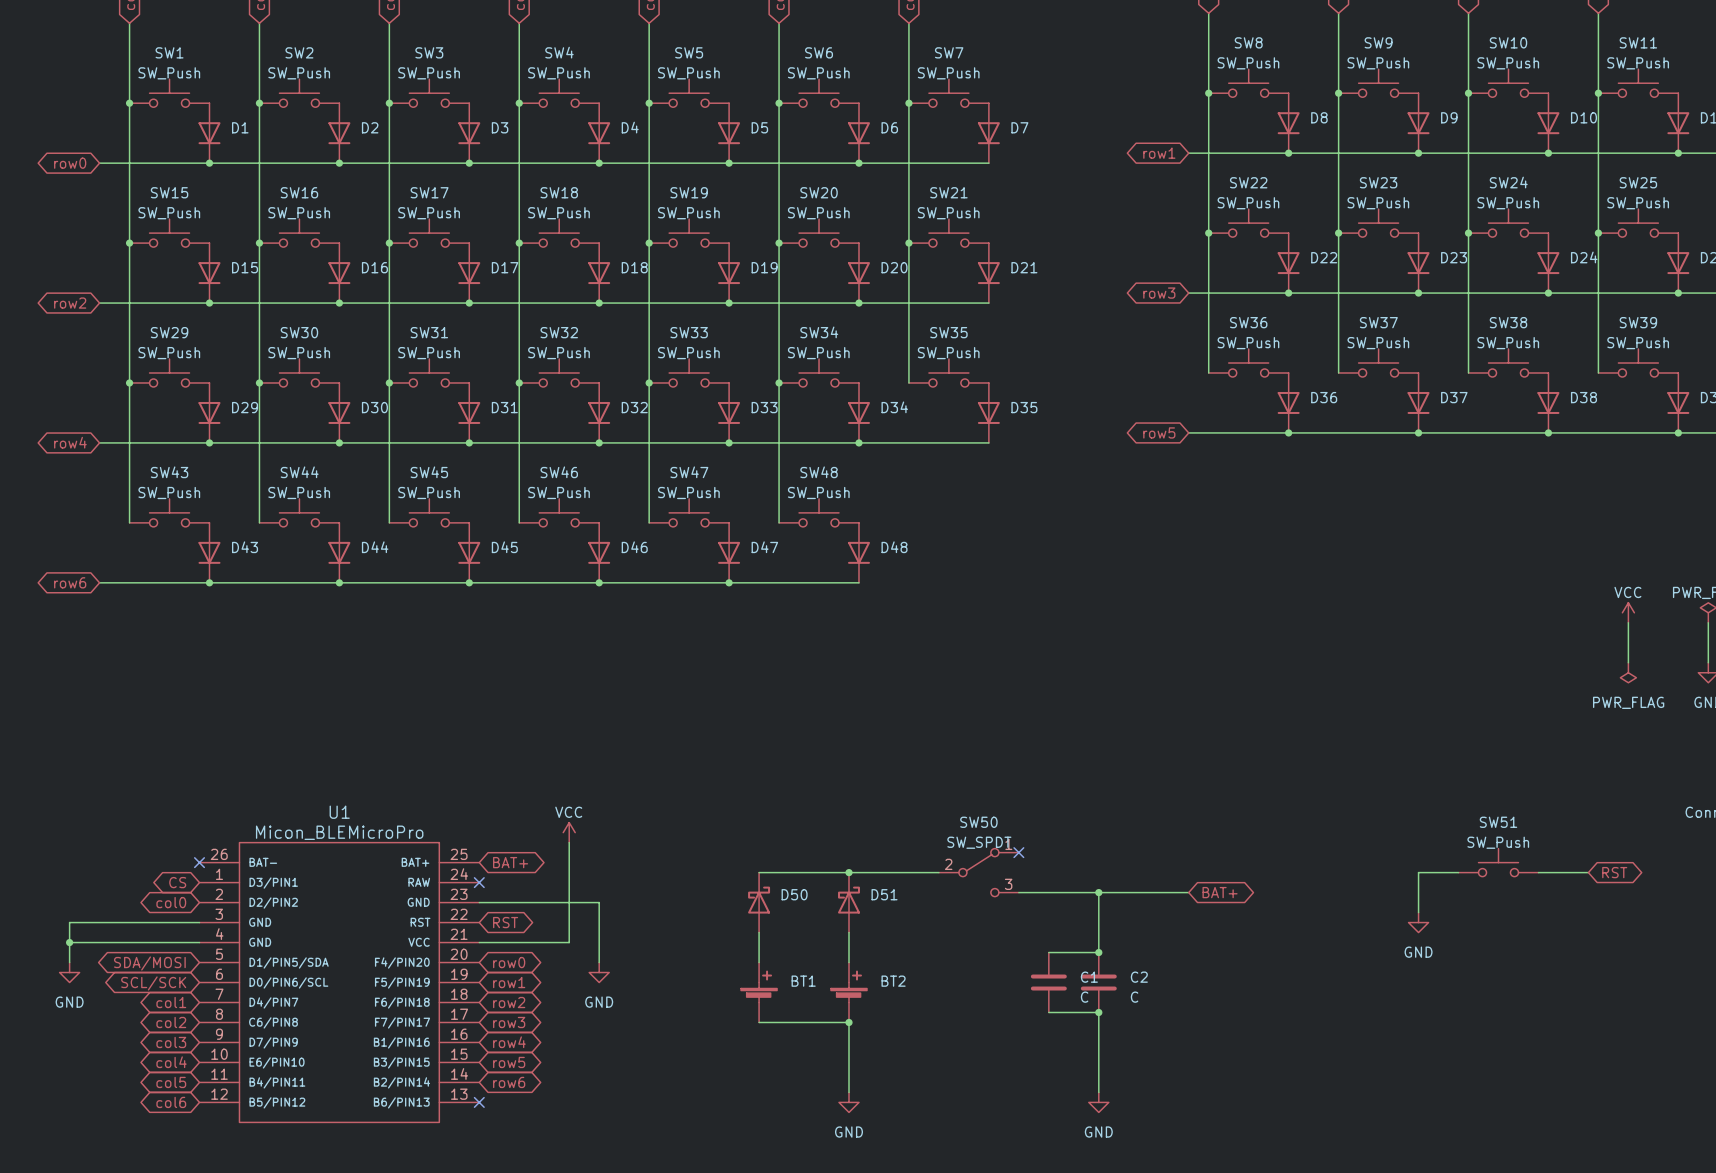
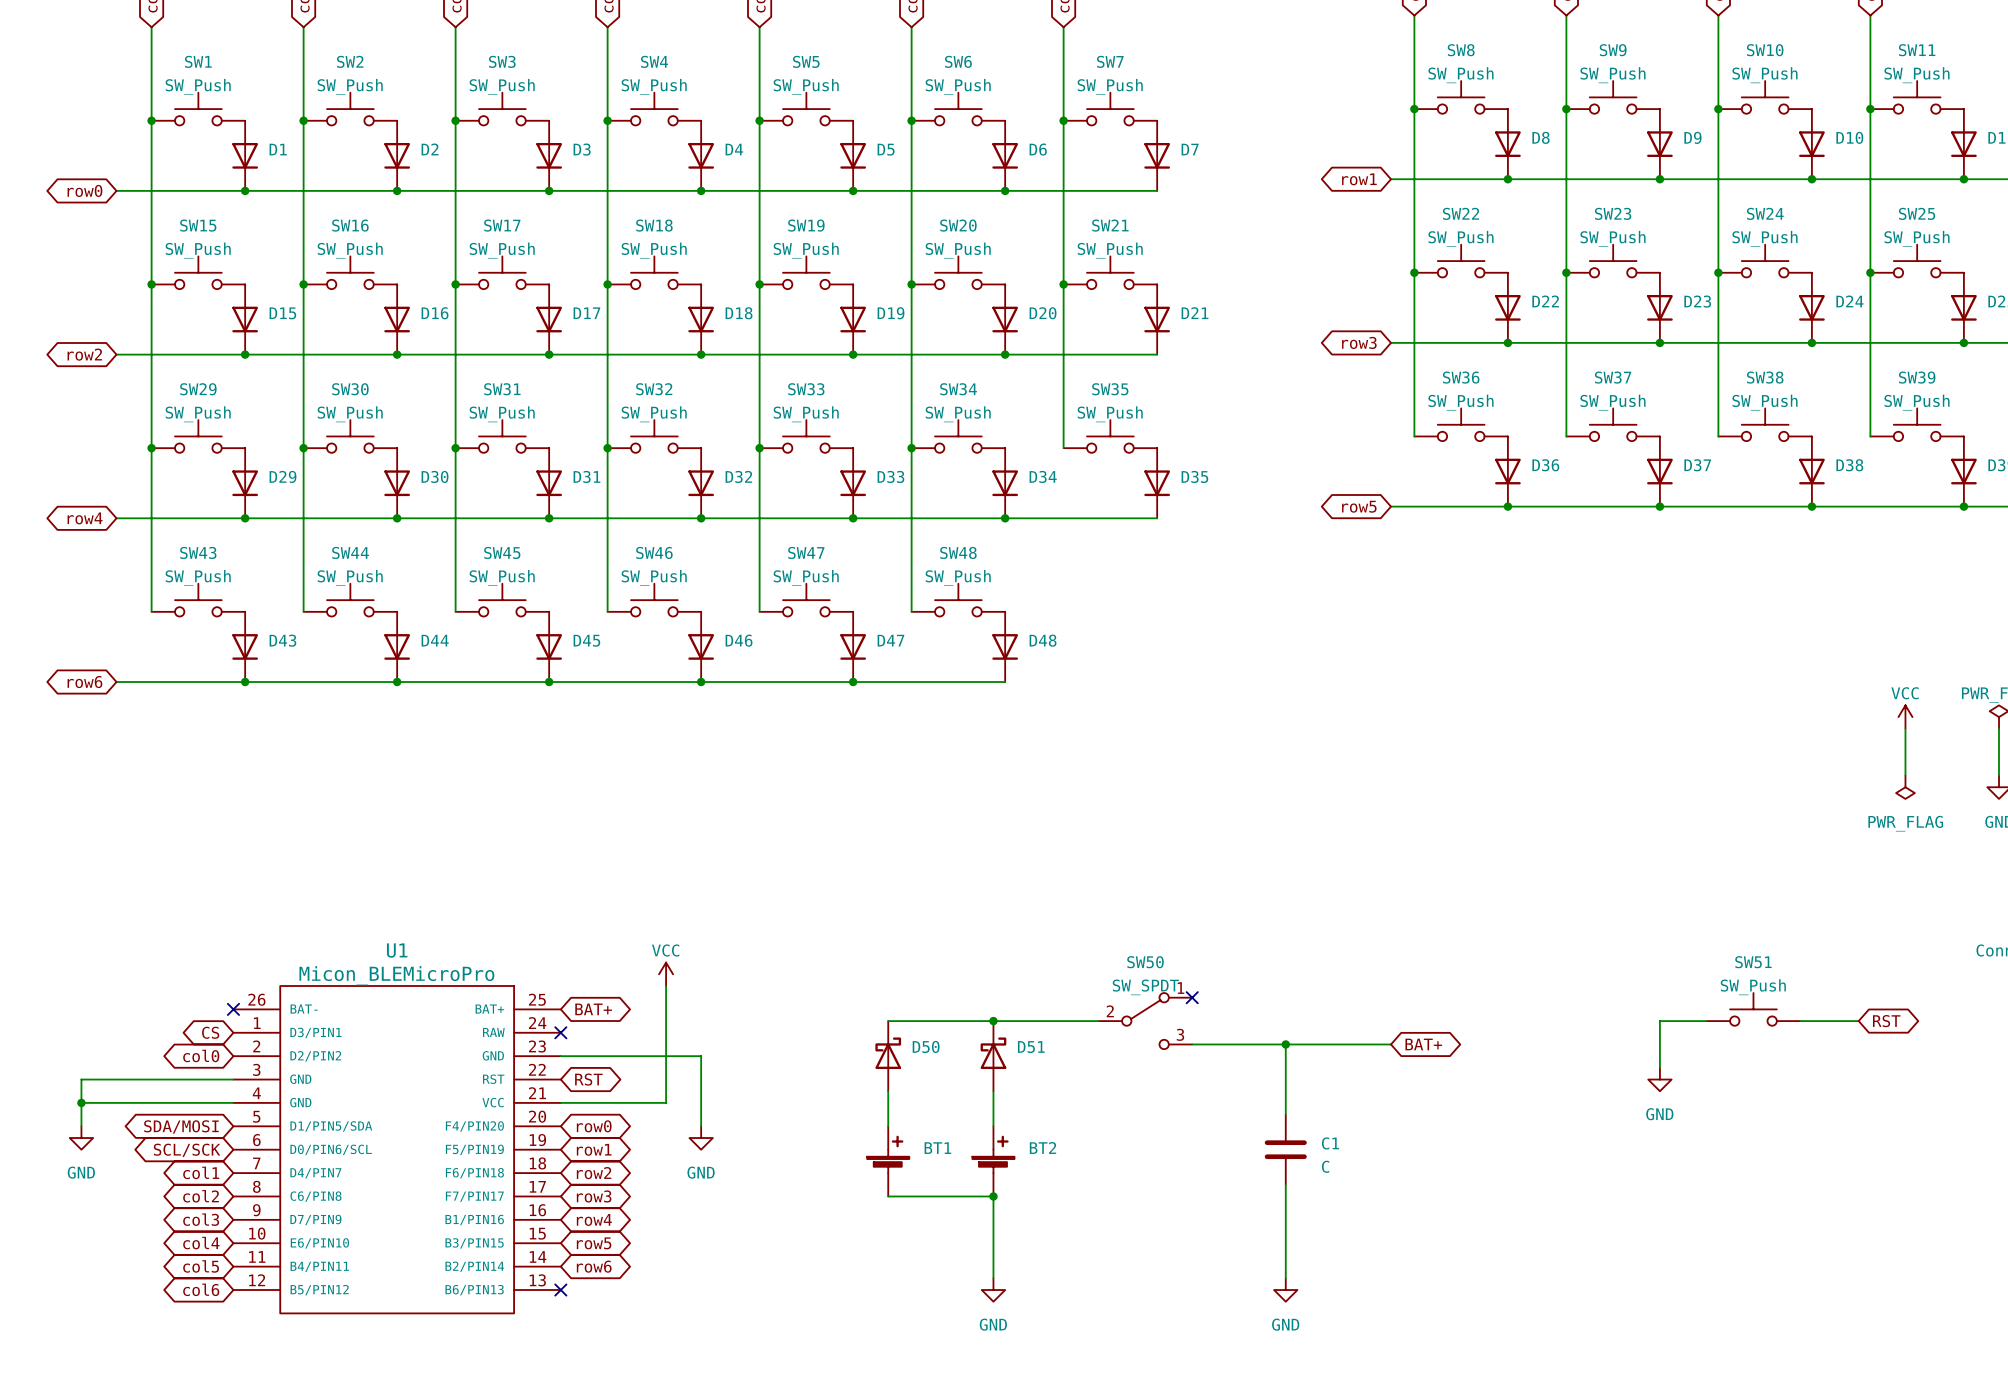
wire: (1048, 952) (1098, 952) -> none
junction: (1098, 952) -> none
C2 name: C2 (1139, 977) -> C1 (1330, 1143)
C1: C (1048, 982) -> none
wire: (1048, 1012) (1098, 1012) -> none
junction: (1098, 1012) -> none

